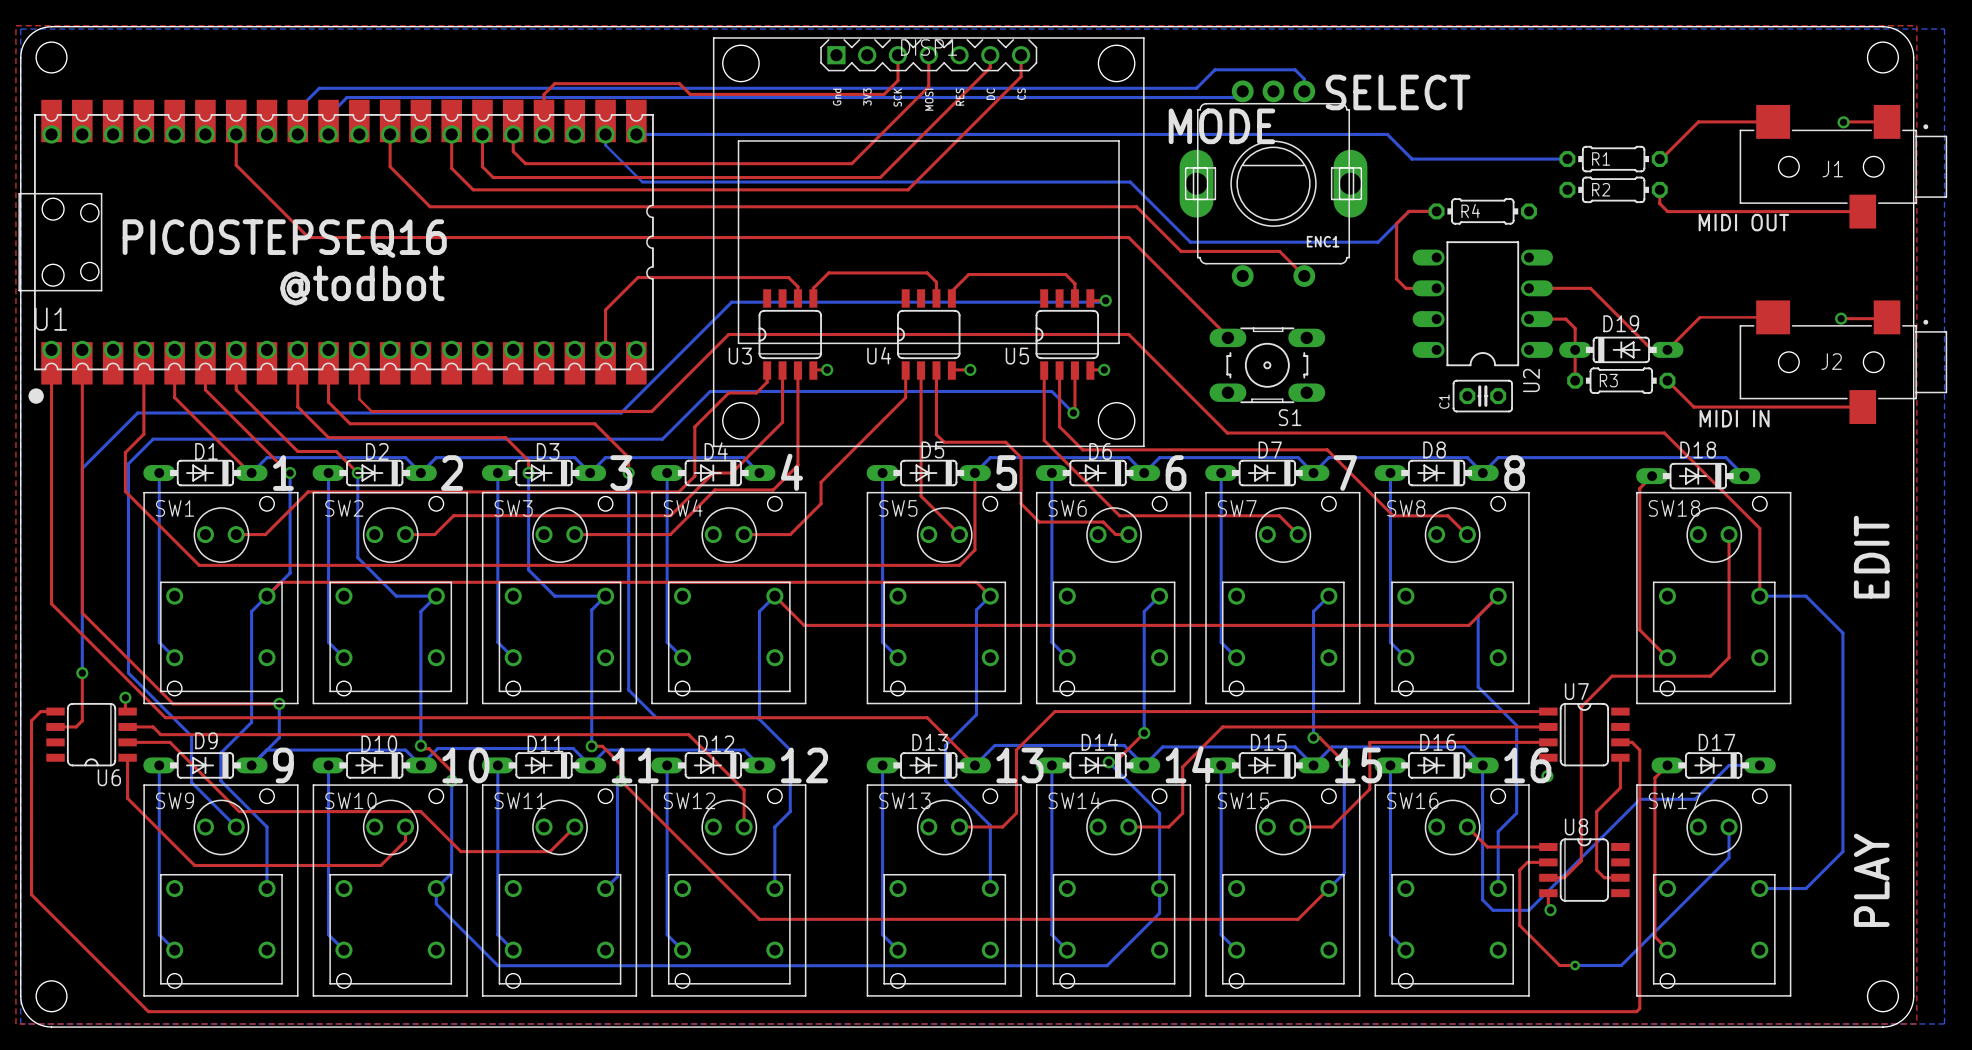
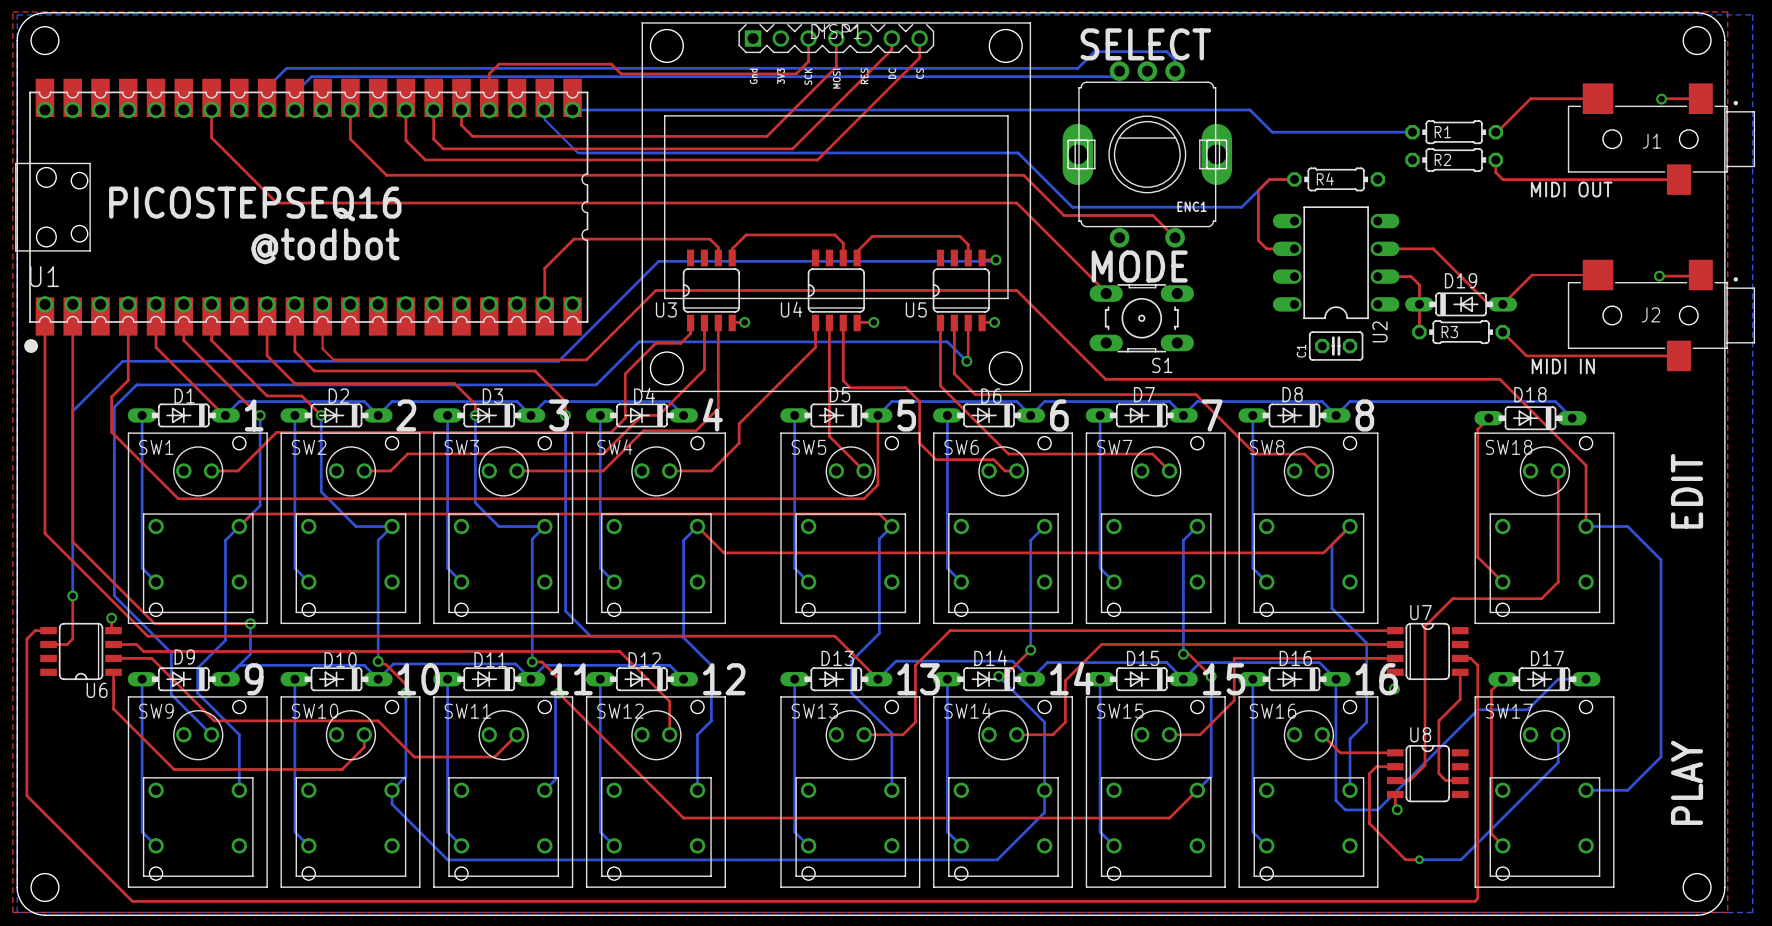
text position: SELECT (1398, 92) -> SELECT (1145, 44)
text position: MODE (1221, 126) -> MODE (1139, 266)

